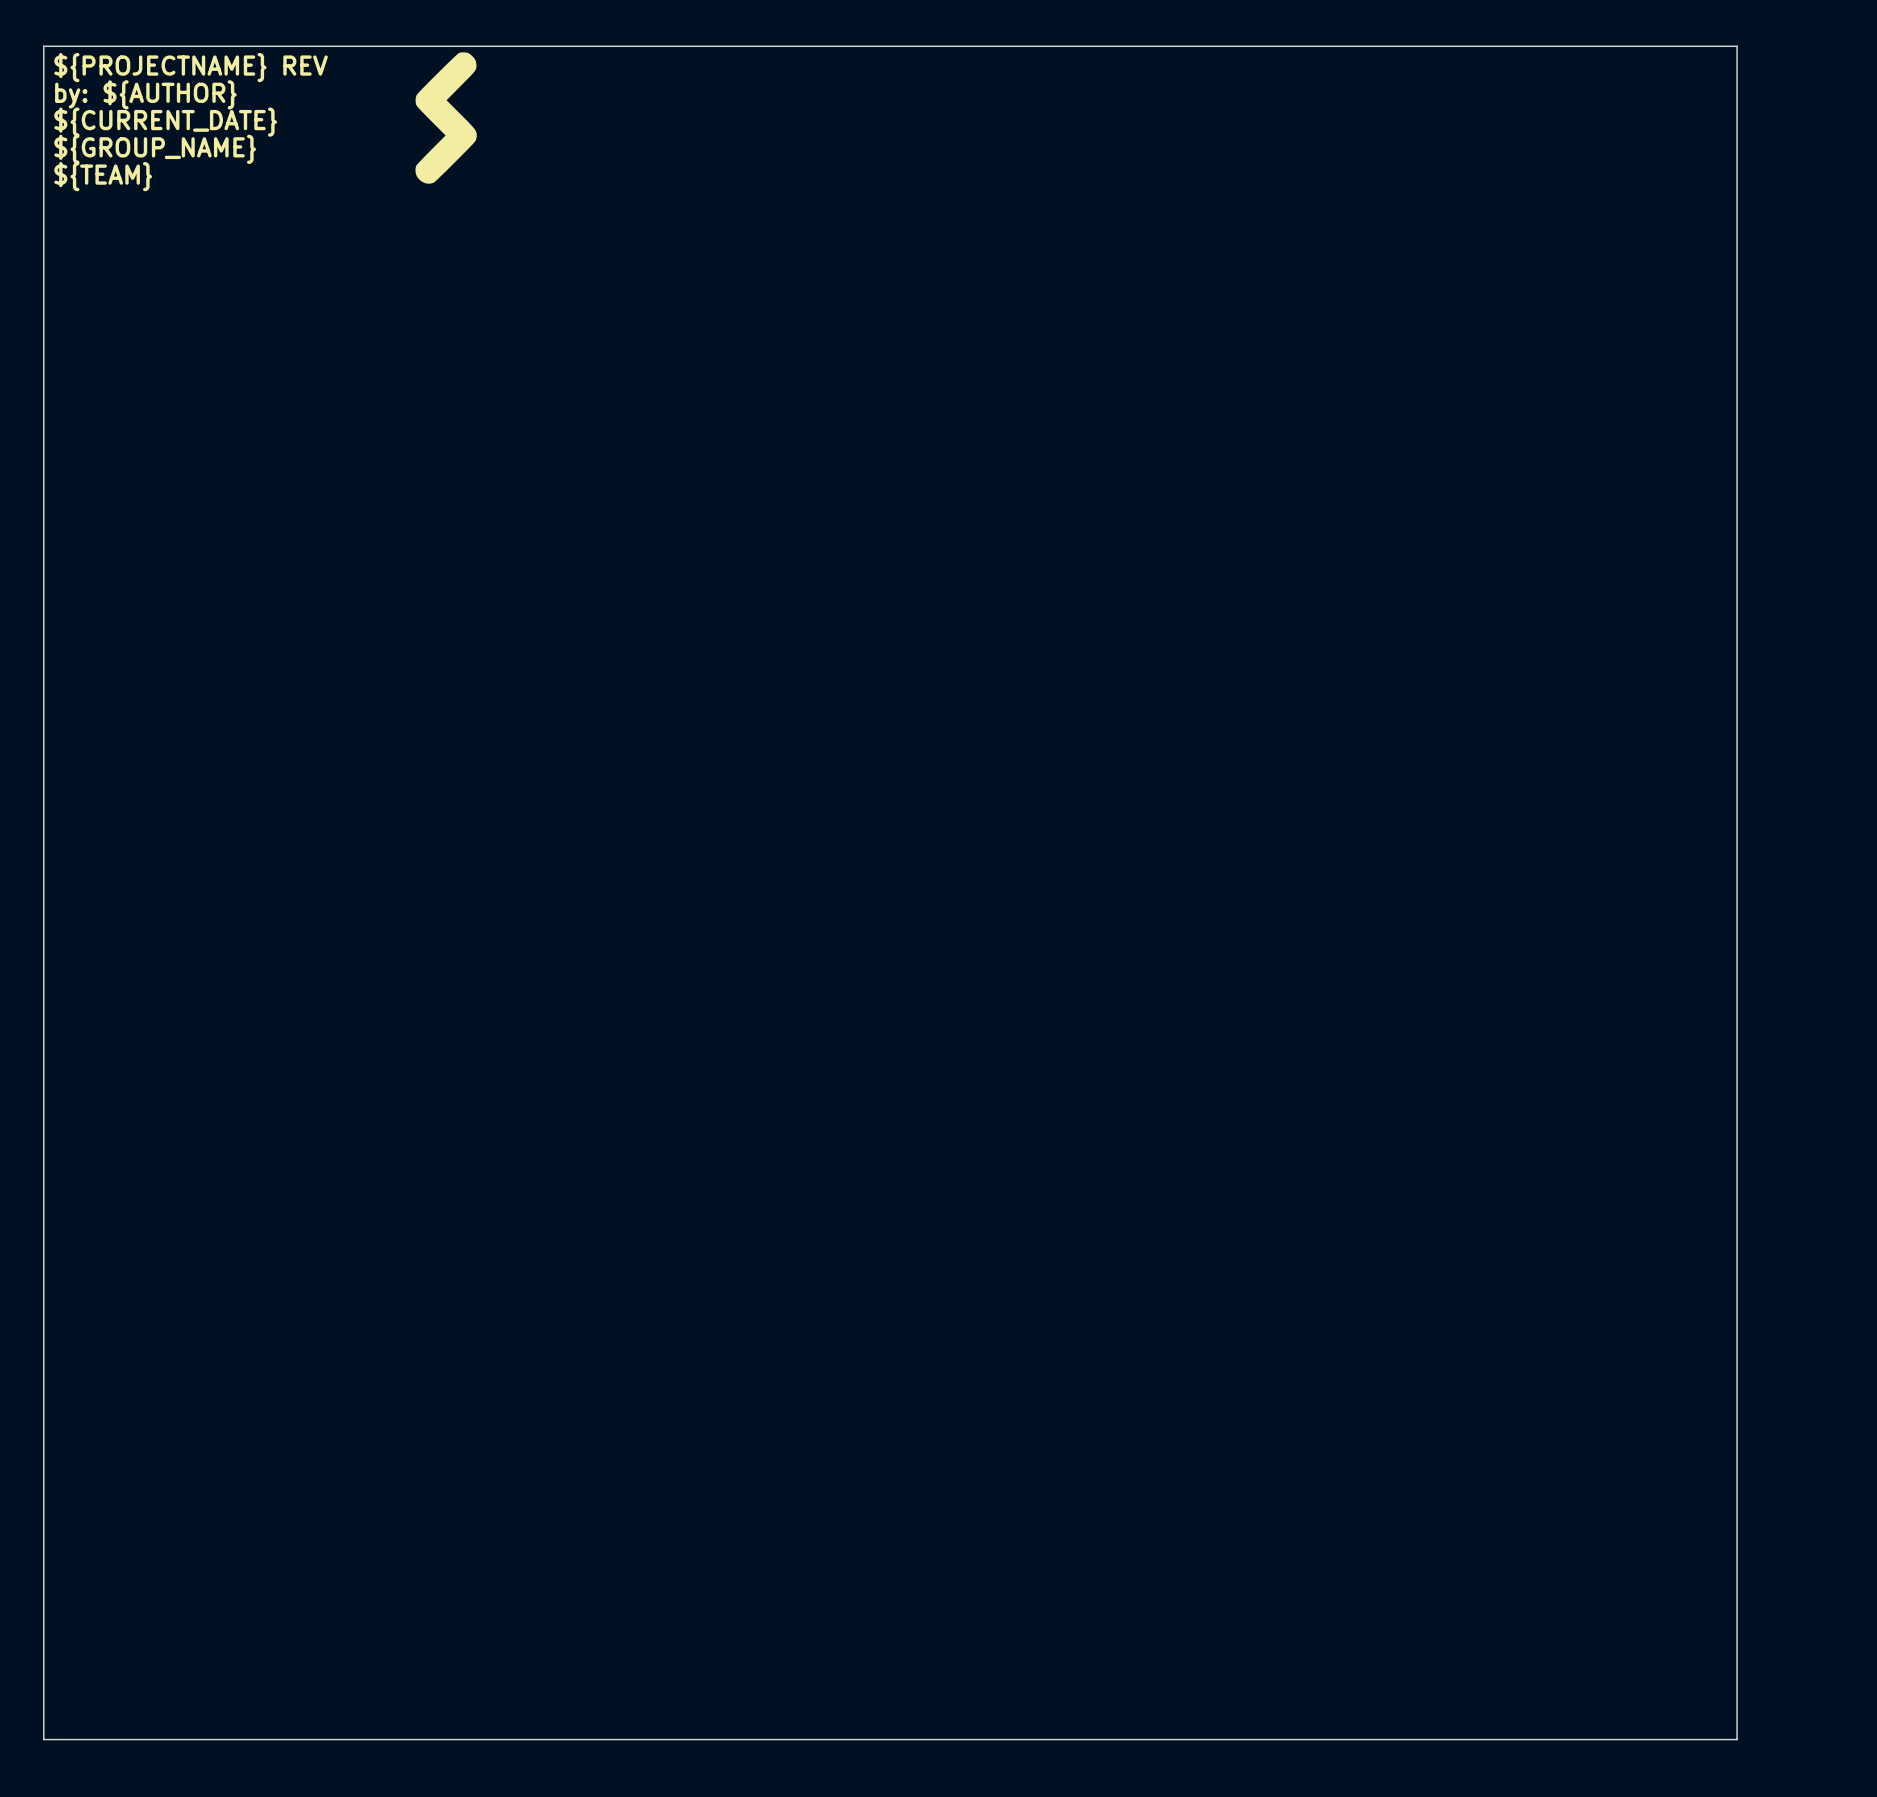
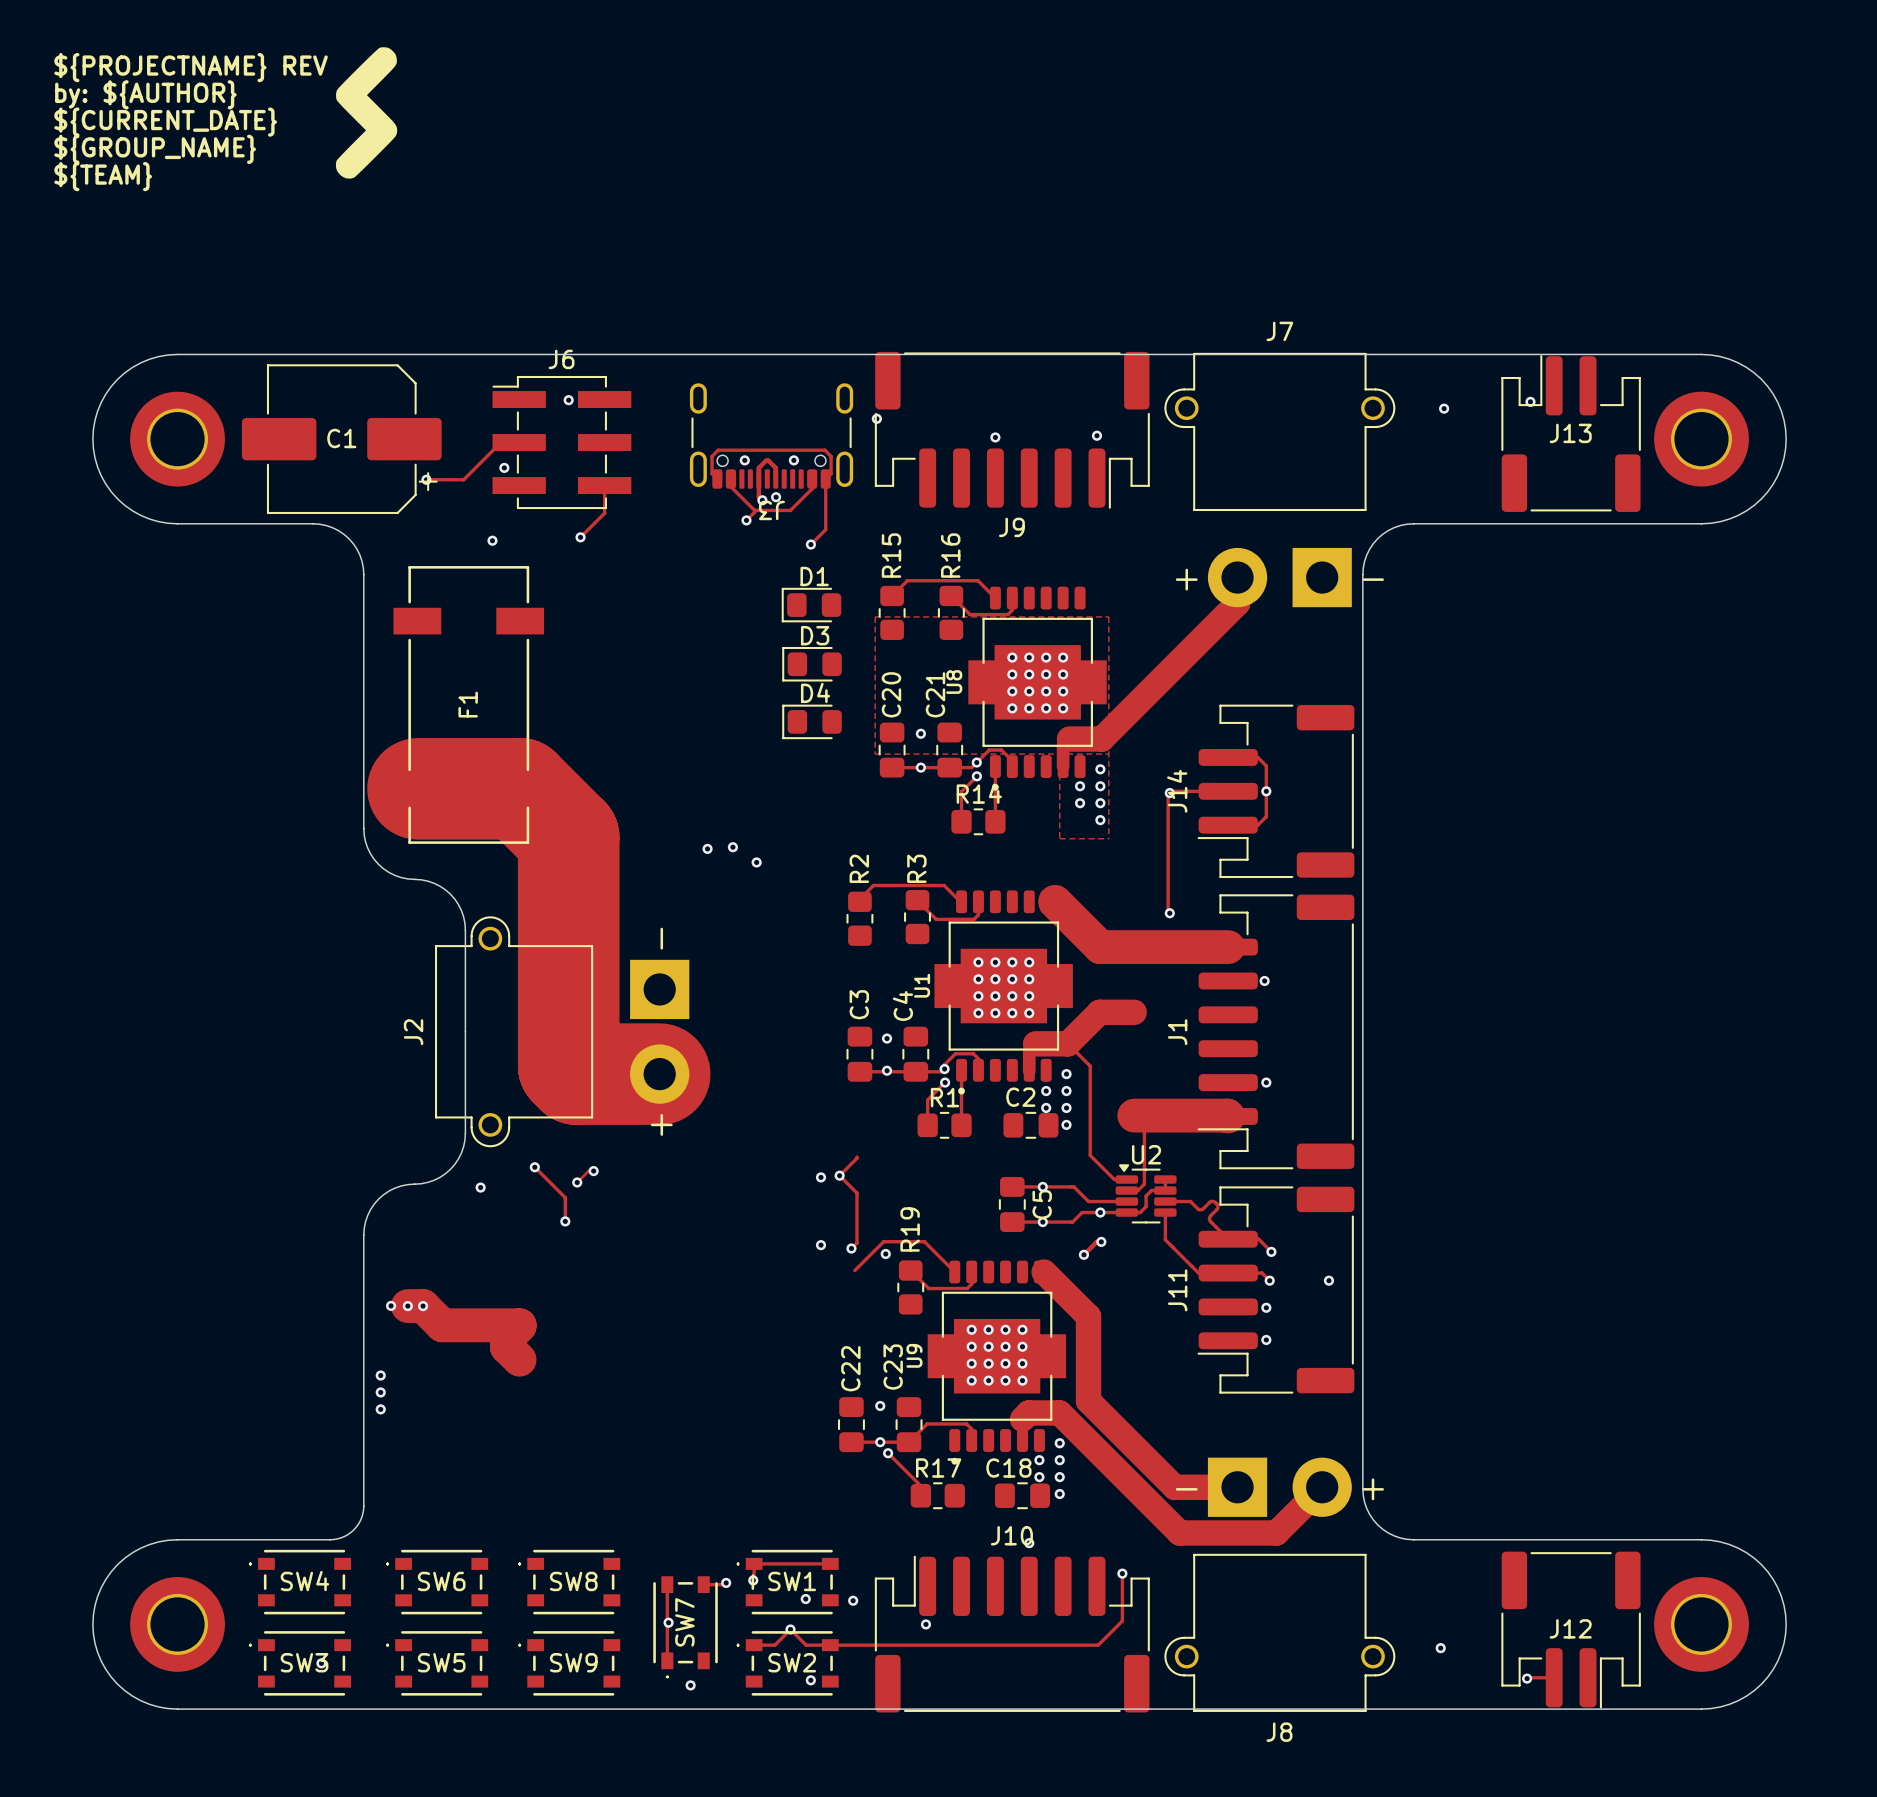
board edge: (43, 46) (1737, 46) (1737, 1739) (43, 1739) (43, 46) -> (177, 354) (149, 359) (132, 367) (117, 379) (105, 394) (97, 411) (93, 429) (93, 448) (97, 467) (105, 484) (117, 498) (132, 510) (149, 519) (177, 523) (319, 524) (332, 527) (343, 534) (356, 549) (362, 561) (363, 574) (364, 835) (370, 853) (383, 868) (401, 877) (427, 881) (440, 886) (454, 899) (463, 917) (465, 930) (465, 1133) (461, 1152) (450, 1169) (434, 1180) (401, 1185) (389, 1190) (374, 1204) (365, 1221) (363, 1234) (363, 1505) (358, 1523) (347, 1534) (333, 1539) (168, 1540) (149, 1544) (124, 1558) (111, 1571) (101, 1587) (95, 1605) (92, 1624) (95, 1643) (101, 1661) (111, 1677) (124, 1690) (149, 1704) (177, 1709) (1701, 1709) (1720, 1706) (1738, 1700) (1754, 1690) (1767, 1677) (1777, 1661) (1784, 1643) (1786, 1624) (1784, 1605) (1777, 1587) (1767, 1571) (1754, 1558) (1738, 1548) (1720, 1541) (1701, 1539) (1407, 1539) (1388, 1532) (1373, 1519) (1364, 1502) (1362, 1488) (1362, 574) (1366, 555) (1373, 543) (1382, 534) (1394, 527) (1407, 524) (1701, 523) (1720, 521) (1738, 515) (1754, 505) (1767, 491) (1781, 467) (1785, 448) (1785, 429) (1781, 411) (1767, 386) (1754, 372) (1729, 359) (1701, 354) (177, 354)
drawing position: (446, 118) -> (366, 112)
via: none -> (568, 400)
via: none -> (1530, 401)
via: none -> (1444, 408)
via: none -> (876, 418)
J9: none -> (1012, 430)
J13: none -> (1571, 433)
J3: none -> (771, 435)
via: none -> (1096, 435)
via: none -> (995, 437)
part: none -> (177, 439)
C1: none -> (341, 439)
part: none -> (1701, 439)
track: none -> (519, 442) (500, 442) (463, 479) (426, 479)
J6: none -> (561, 442)
via: none -> (744, 460)
via: none -> (793, 460)
via: none -> (504, 467)
via: none -> (426, 479)
track: none -> (717, 479) (712, 473) (712, 456) (718, 450) (824, 450) (831, 456) (831, 473) (825, 479) (825, 529) (810, 544)
track: none -> (730, 479) (730, 486) (754, 510)
track: none -> (775, 479) (775, 467) (768, 460) (765, 460) (758, 467) (758, 496) (762, 500)
track: none -> (812, 479) (812, 488) (790, 510) (754, 510)
J7: none -> (1279, 480)
track: none -> (604, 485) (604, 513) (580, 537)
via: none -> (776, 497)
via: none -> (762, 500)
track: none -> (754, 510) (746, 520)
via: none -> (746, 520)
via: none -> (580, 537)
via: none -> (492, 540)
via: none -> (810, 544)
track: none -> (1237, 577) (1237, 603) (1101, 739) (1069, 739) (1063, 745) (1063, 766)
track: none -> (892, 595) (907, 580) (978, 580) (995, 598)
track: none -> (951, 595) (970, 614) (1007, 614) (1012, 610) (1012, 598)
D1: none -> (811, 605)
R15: none -> (892, 612)
R16: none -> (951, 612)
via: none -> (1012, 657)
via: none -> (1029, 657)
via: none -> (1046, 657)
via: none -> (1063, 657)
D3: none -> (812, 664)
via: none -> (1012, 674)
via: none -> (1029, 674)
via: none -> (1046, 674)
via: none -> (1063, 674)
U8: none -> (1037, 688)
via: none -> (1012, 691)
via: none -> (1029, 691)
via: none -> (1046, 691)
via: none -> (1063, 691)
F1: none -> (468, 704)
via: none -> (1012, 708)
via: none -> (1029, 708)
via: none -> (1046, 708)
via: none -> (1063, 708)
D4: none -> (812, 721)
via: none -> (920, 733)
zone outline: none -> (1108, 745) (1059, 745) (1059, 838) (1108, 838) (1108, 616) (875, 616) (875, 754) (1108, 754)
C20: none -> (892, 750)
C21: none -> (949, 750)
track: none -> (1228, 757) (1257, 757) (1266, 765) (1266, 816) (1257, 825) (1228, 825)
via: none -> (976, 762)
track: none -> (995, 766) (995, 821)
track: none -> (1012, 766) (1012, 760) (1001, 750) (989, 750) (971, 767) (892, 767)
via: none -> (920, 767)
via: none -> (1100, 769)
track: none -> (976, 776) (961, 791) (961, 821)
via: none -> (976, 776)
via: none -> (1080, 786)
via: none -> (1100, 786)
track: none -> (417, 788) (520, 788) (568, 837) (568, 1066) (576, 1074) (659, 1074)
track: none -> (1228, 791) (1171, 791) (1168, 794) (1168, 911) (1169, 913)
via: none -> (1266, 791)
J14: none -> (1275, 791)
via: none -> (1169, 793)
via: none -> (1080, 803)
via: none -> (1100, 803)
via: none -> (1100, 820)
R14: none -> (978, 821)
via: none -> (732, 847)
via: none -> (707, 848)
via: none -> (756, 862)
track: none -> (858, 900) (873, 885) (944, 885) (961, 902)
track: none -> (917, 900) (936, 919) (974, 919) (978, 914) (978, 902)
track: none -> (1055, 901) (1100, 947) (1228, 947)
via: none -> (1169, 913)
R3: none -> (917, 917)
R2: none -> (859, 918)
via: none -> (978, 962)
via: none -> (995, 962)
via: none -> (1012, 962)
via: none -> (1029, 962)
via: none -> (978, 979)
via: none -> (995, 979)
via: none -> (1012, 979)
via: none -> (1029, 979)
via: none -> (1264, 980)
U1: none -> (1003, 992)
via: none -> (978, 996)
via: none -> (995, 996)
via: none -> (1012, 996)
via: none -> (1029, 996)
track: none -> (1134, 1012) (1099, 1012) (1067, 1043)
via: none -> (978, 1013)
via: none -> (995, 1013)
via: none -> (1012, 1013)
via: none -> (1029, 1013)
J2: none -> (562, 1031)
J1: none -> (1275, 1031)
via: none -> (887, 1038)
track: none -> (1067, 1043) (1090, 1066) (1090, 1155) (1114, 1179) (1126, 1179)
track: none -> (1067, 1043) (1035, 1043) (1029, 1050) (1029, 1071)
C3: none -> (859, 1054)
C4: none -> (915, 1054)
via: none -> (944, 1069)
via: none -> (887, 1070)
track: none -> (961, 1070) (961, 1125)
track: none -> (978, 1070) (978, 1058) (973, 1053) (955, 1053) (944, 1064) (944, 1069) (941, 1071) (859, 1071)
via: none -> (1066, 1074)
track: none -> (945, 1082) (927, 1100) (927, 1125)
via: none -> (945, 1082)
via: none -> (1266, 1082)
via: none -> (1046, 1091)
via: none -> (1066, 1091)
via: none -> (1046, 1107)
via: none -> (1066, 1107)
track: none -> (1228, 1116) (1134, 1115) (1144, 1125) (1144, 1184) (1138, 1190) (1126, 1190)
via: none -> (1066, 1124)
R1: none -> (944, 1125)
C2: none -> (1030, 1125)
track: none -> (856, 1157) (839, 1175) (856, 1193) (856, 1243) (851, 1248)
track: none -> (534, 1167) (565, 1197) (565, 1221)
via: none -> (534, 1167)
track: none -> (593, 1171) (588, 1171) (577, 1182)
via: none -> (593, 1171)
via: none -> (839, 1175)
via: none -> (820, 1177)
track: none -> (1165, 1179) (1165, 1190) (1151, 1190) (1146, 1196) (1146, 1206) (1140, 1212) (1082, 1212) (1072, 1222) (1012, 1222)
via: none -> (577, 1182)
track: none -> (1012, 1186) (1073, 1186) (1088, 1201) (1126, 1201)
via: none -> (1042, 1186)
via: none -> (480, 1187)
U2: none -> (1146, 1193)
track: none -> (1165, 1201) (1190, 1201) (1200, 1209) (1210, 1201) (1213, 1201) (1217, 1207) (1209, 1216) (1209, 1220) (1228, 1239) (1258, 1239) (1271, 1251)
C5: none -> (1012, 1204)
via: none -> (1100, 1212)
track: none -> (1165, 1212) (1165, 1239) (1198, 1273) (1262, 1273) (1269, 1280)
via: none -> (565, 1221)
via: none -> (1042, 1222)
track: none -> (1101, 1241) (1096, 1241) (1083, 1254)
via: none -> (1101, 1241)
via: none -> (820, 1245)
via: none -> (851, 1248)
via: none -> (1271, 1251)
via: none -> (885, 1254)
via: none -> (1083, 1254)
track: none -> (854, 1270) (883, 1241) (924, 1241) (954, 1272)
track: none -> (910, 1270) (928, 1288) (967, 1288) (971, 1284) (971, 1272)
track: none -> (1044, 1272) (1088, 1316) (1088, 1401) (1174, 1487) (1237, 1487)
via: none -> (1269, 1280)
via: none -> (1328, 1280)
R19: none -> (910, 1287)
J11: none -> (1275, 1290)
via: none -> (391, 1305)
track: none -> (407, 1306) (423, 1306) (442, 1325) (519, 1325) (506, 1338) (506, 1347) (519, 1359)
via: none -> (407, 1306)
via: none -> (423, 1306)
via: none -> (1266, 1307)
via: none -> (971, 1329)
via: none -> (988, 1329)
via: none -> (1005, 1329)
via: none -> (1022, 1329)
via: none -> (1266, 1339)
via: none -> (971, 1346)
via: none -> (988, 1346)
via: none -> (1005, 1346)
via: none -> (1022, 1346)
U9: none -> (996, 1362)
via: none -> (971, 1363)
via: none -> (988, 1363)
via: none -> (1005, 1363)
via: none -> (1022, 1363)
via: none -> (380, 1375)
via: none -> (971, 1380)
via: none -> (988, 1380)
via: none -> (1005, 1380)
via: none -> (1022, 1380)
via: none -> (380, 1392)
via: none -> (880, 1405)
via: none -> (380, 1409)
track: none -> (1022, 1419) (1028, 1412) (1059, 1412) (1179, 1532) (1276, 1532) (1322, 1487)
C22: none -> (851, 1424)
C23: none -> (909, 1424)
track: none -> (971, 1440) (971, 1429) (966, 1423) (927, 1423) (909, 1442) (851, 1442)
via: none -> (880, 1442)
via: none -> (1059, 1443)
track: none -> (888, 1453) (920, 1486) (920, 1495)
via: none -> (888, 1453)
via: none -> (1039, 1460)
via: none -> (1059, 1460)
via: none -> (1039, 1477)
via: none -> (1059, 1477)
via: none -> (1059, 1494)
R17: none -> (937, 1495)
C18: none -> (1022, 1495)
via: none -> (1029, 1543)
track: none -> (830, 1563) (754, 1563) (753, 1580)
track: none -> (1122, 1573) (1122, 1621) (1098, 1645) (806, 1645) (790, 1629) (774, 1645) (754, 1645)
via: none -> (1122, 1573)
via: none -> (753, 1580)
SW4: none -> (304, 1582)
SW6: none -> (441, 1582)
SW8: none -> (573, 1582)
track: none -> (726, 1582) (724, 1584) (703, 1584)
via: none -> (726, 1582)
SW1: none -> (792, 1582)
track: none -> (667, 1584) (667, 1660)
J8: none -> (1279, 1584)
via: none -> (805, 1599)
via: none -> (853, 1600)
via: none -> (668, 1622)
SW7: none -> (685, 1622)
part: none -> (177, 1624)
via: none -> (925, 1624)
part: none -> (1701, 1624)
via: none -> (790, 1629)
J12: none -> (1571, 1630)
J10: none -> (1012, 1634)
via: none -> (1440, 1648)
SW3: none -> (304, 1663)
via: none -> (321, 1663)
SW5: none -> (441, 1663)
SW9: none -> (573, 1663)
SW2: none -> (792, 1663)
track: none -> (1554, 1677) (1527, 1678)
via: none -> (1527, 1678)
via: none -> (810, 1680)
via: none -> (690, 1685)

